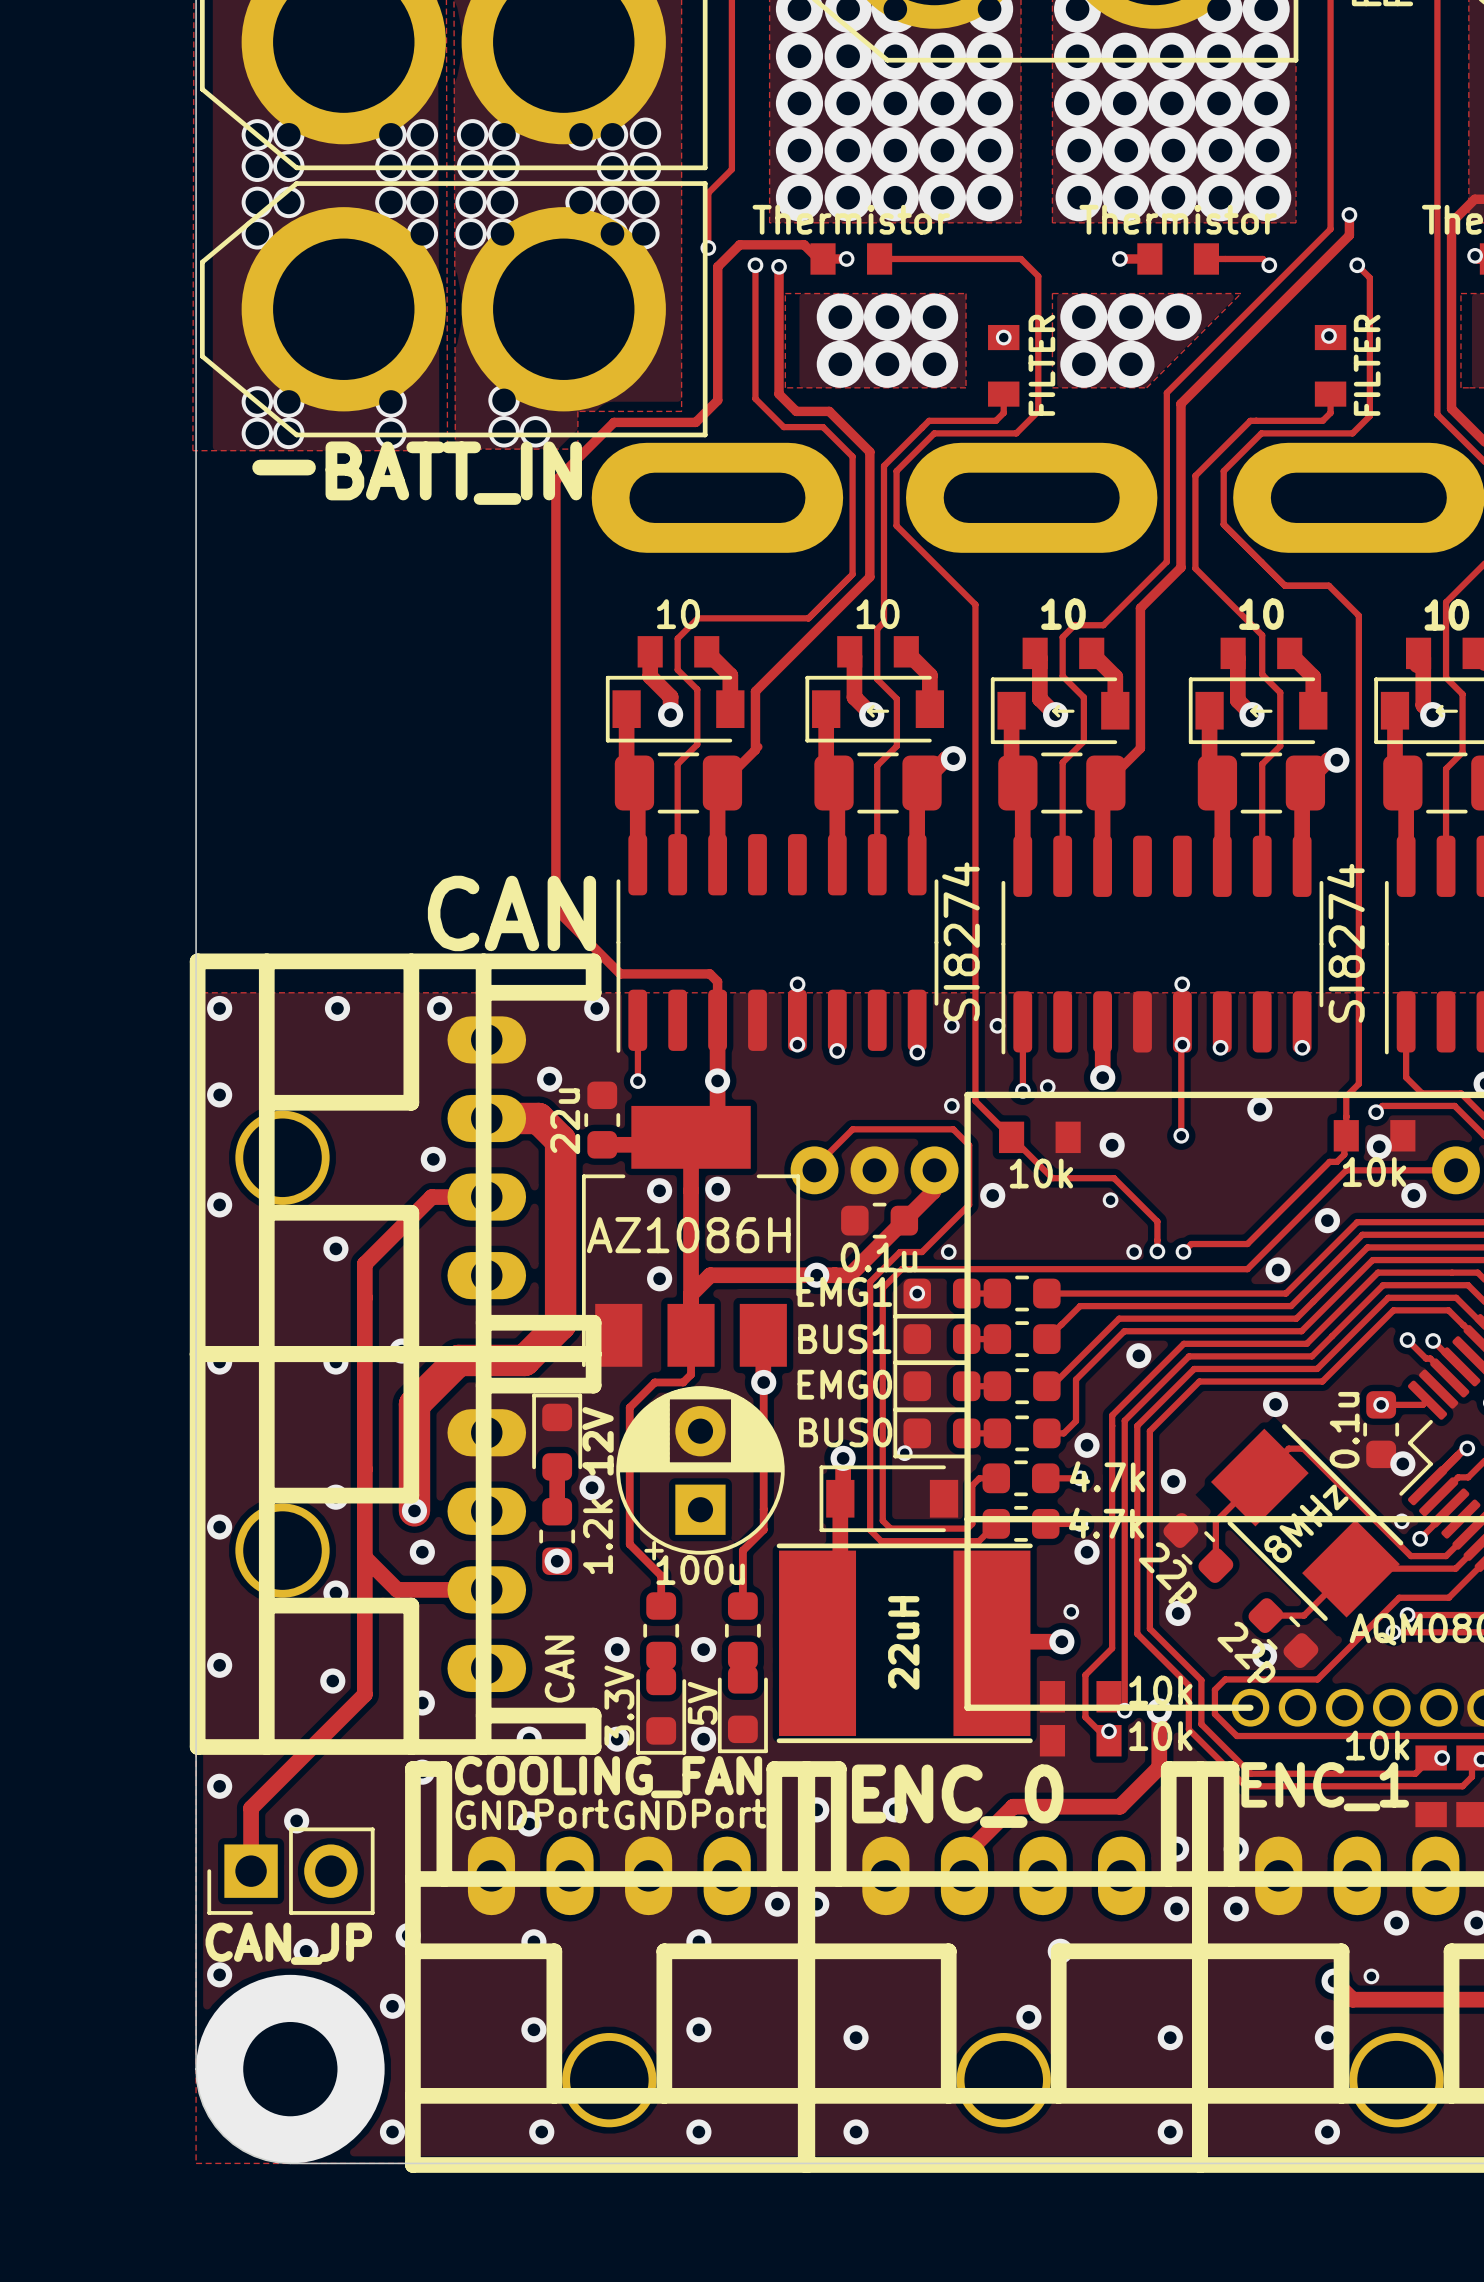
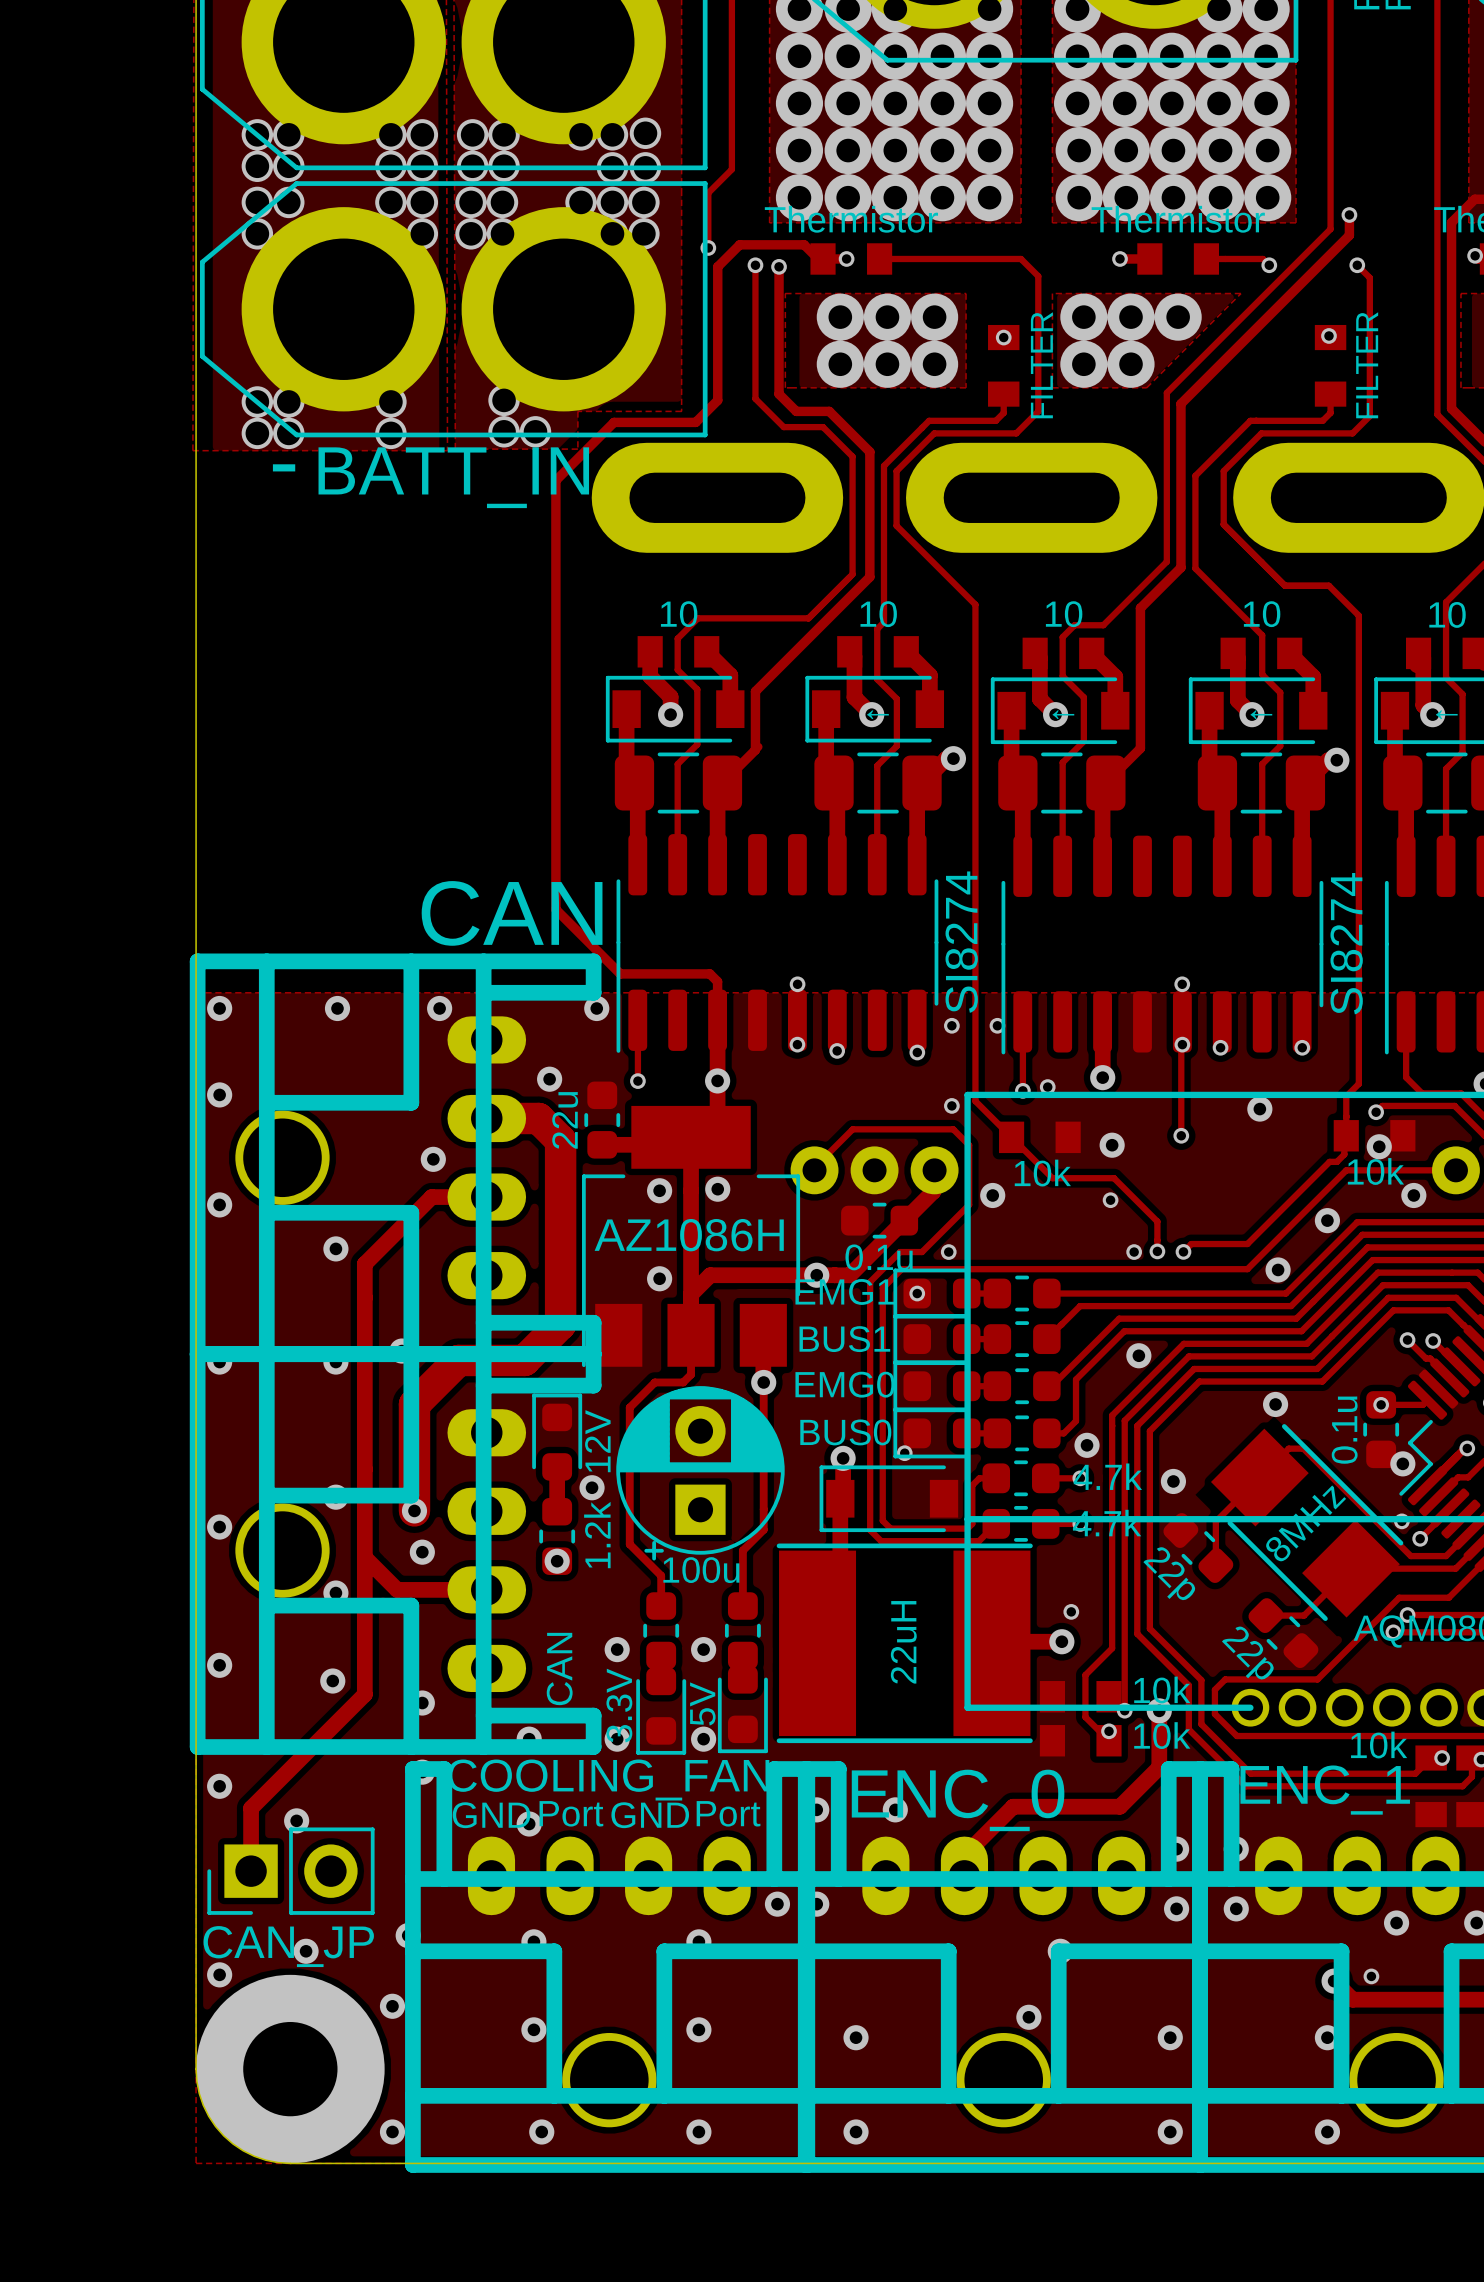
via: (1087, 1552) -> none
via: (1178, 1613) -> none
via: (1264, 1655) -> none

